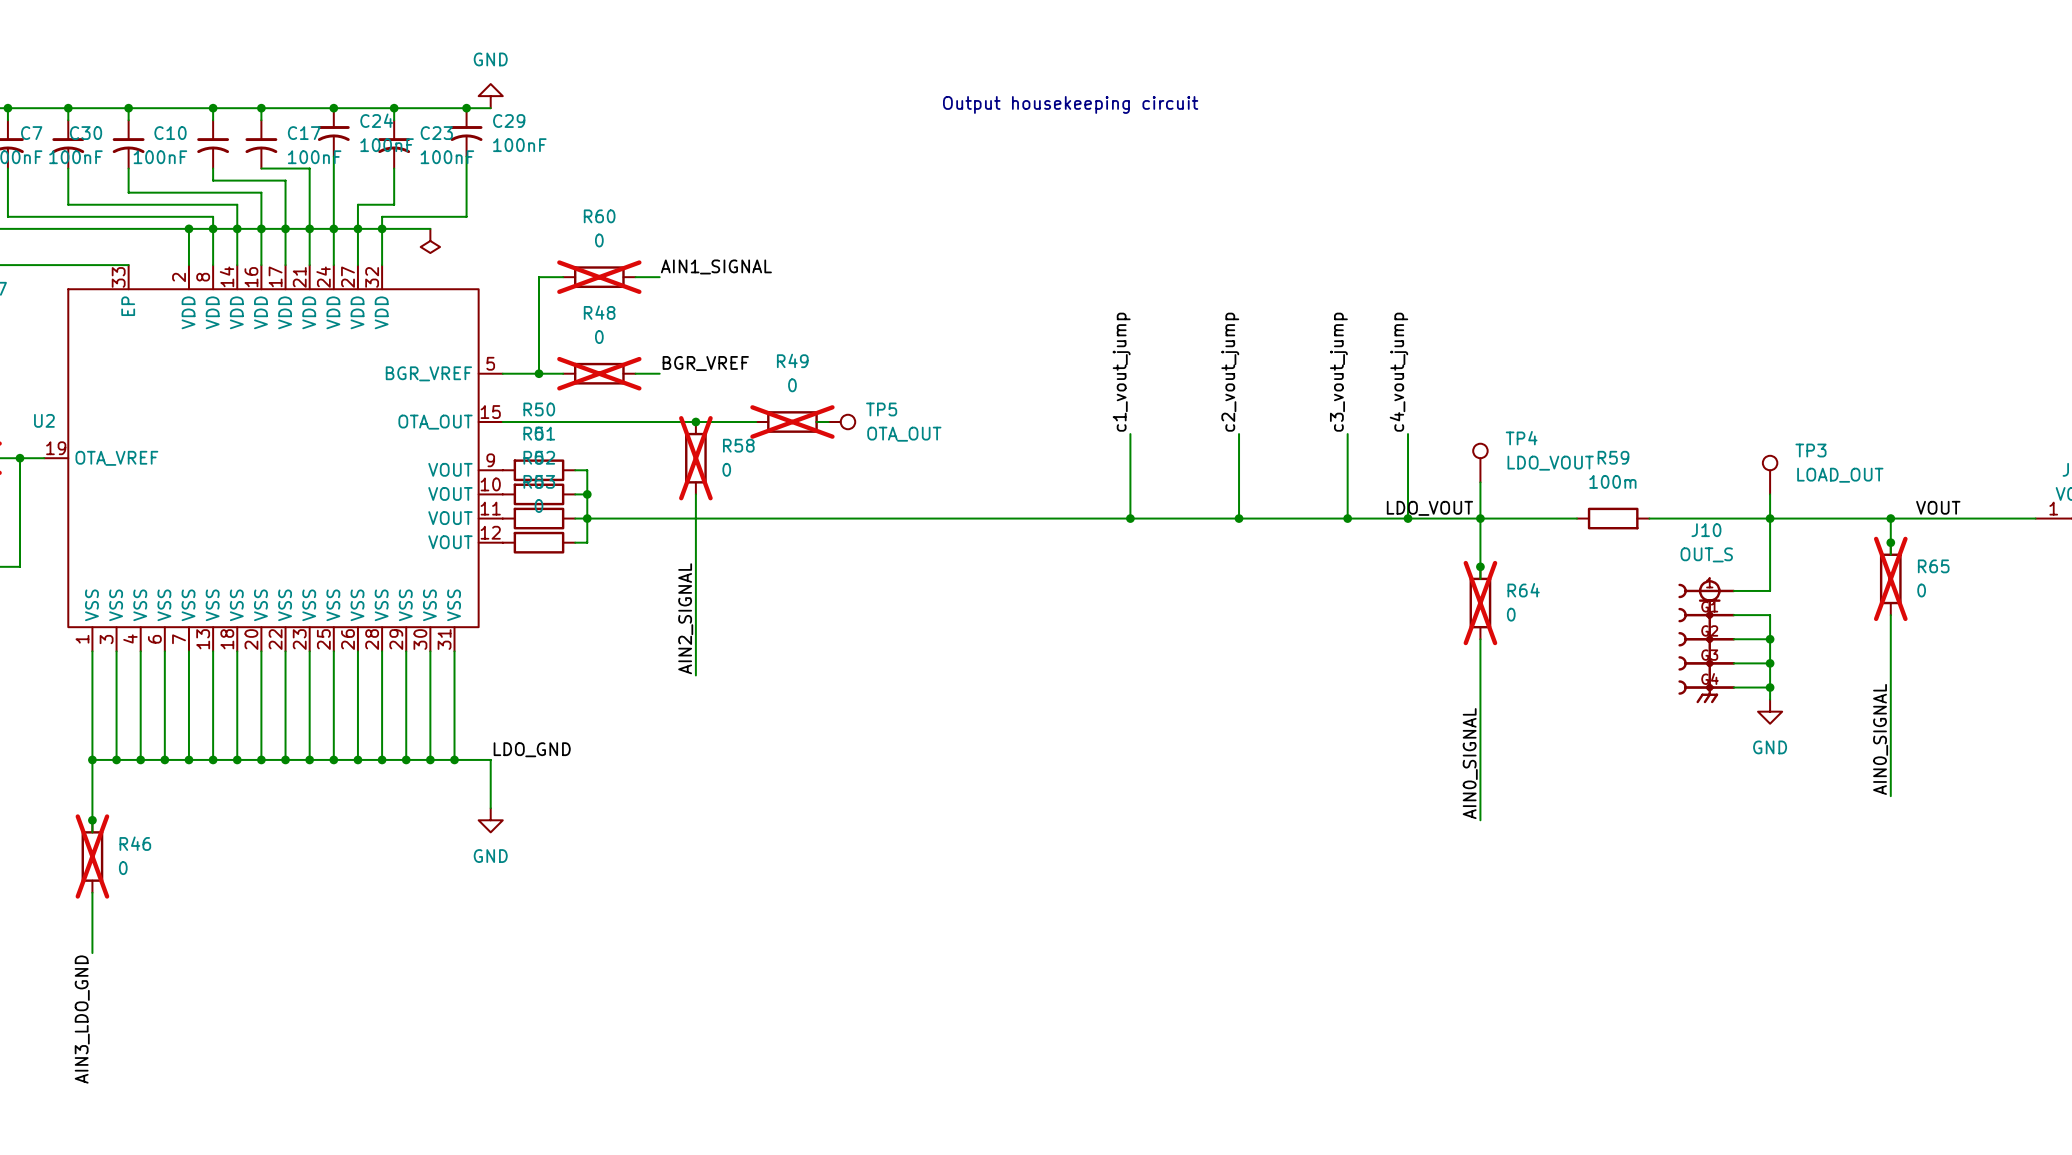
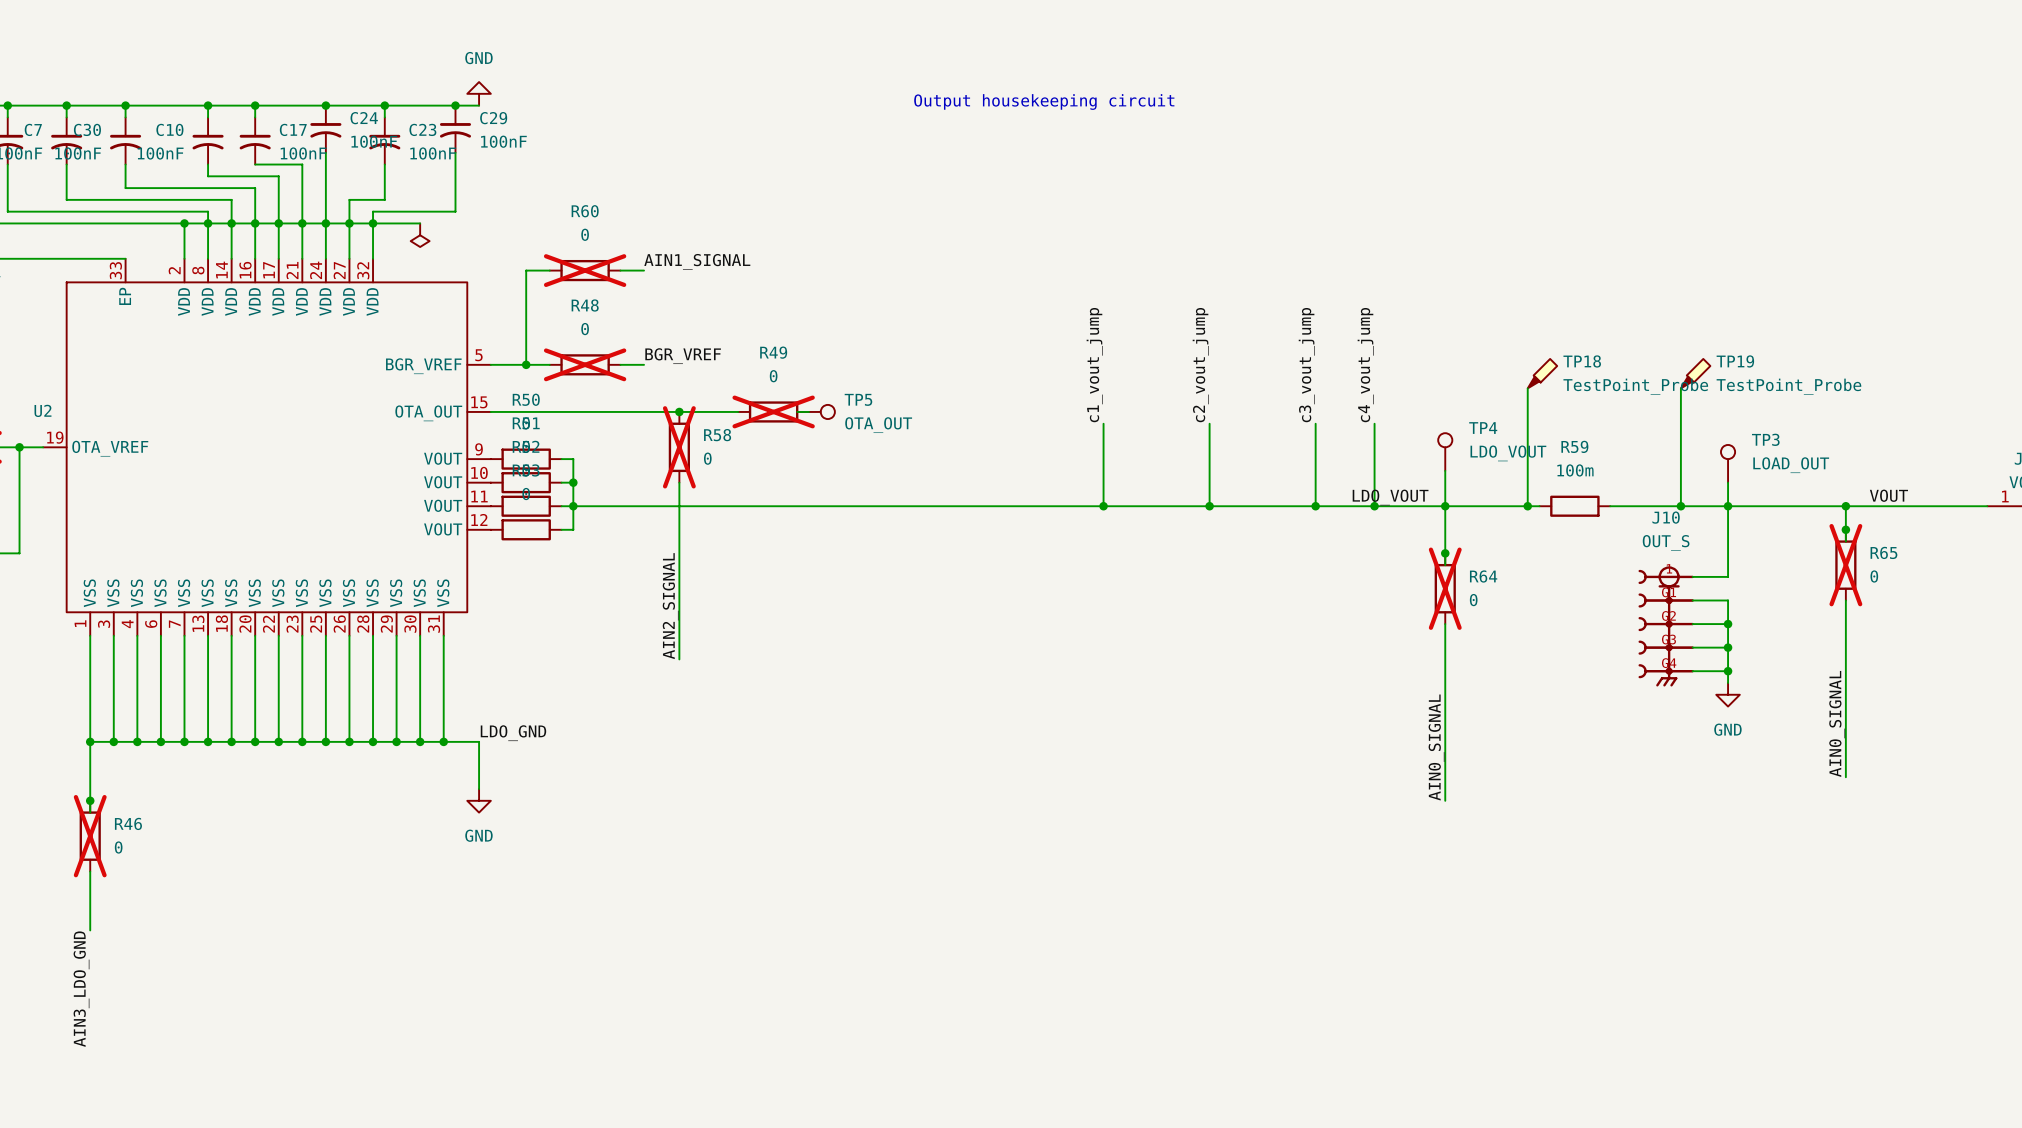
TP18: none -> TestPoint_Probe (1542, 373)
TP19: none -> TestPoint_Probe (1695, 373)
wire: none -> (1527, 388) (1527, 506)
wire: none -> (1680, 388) (1680, 506)
junction: none -> (1527, 506)
junction: none -> (1680, 506)

